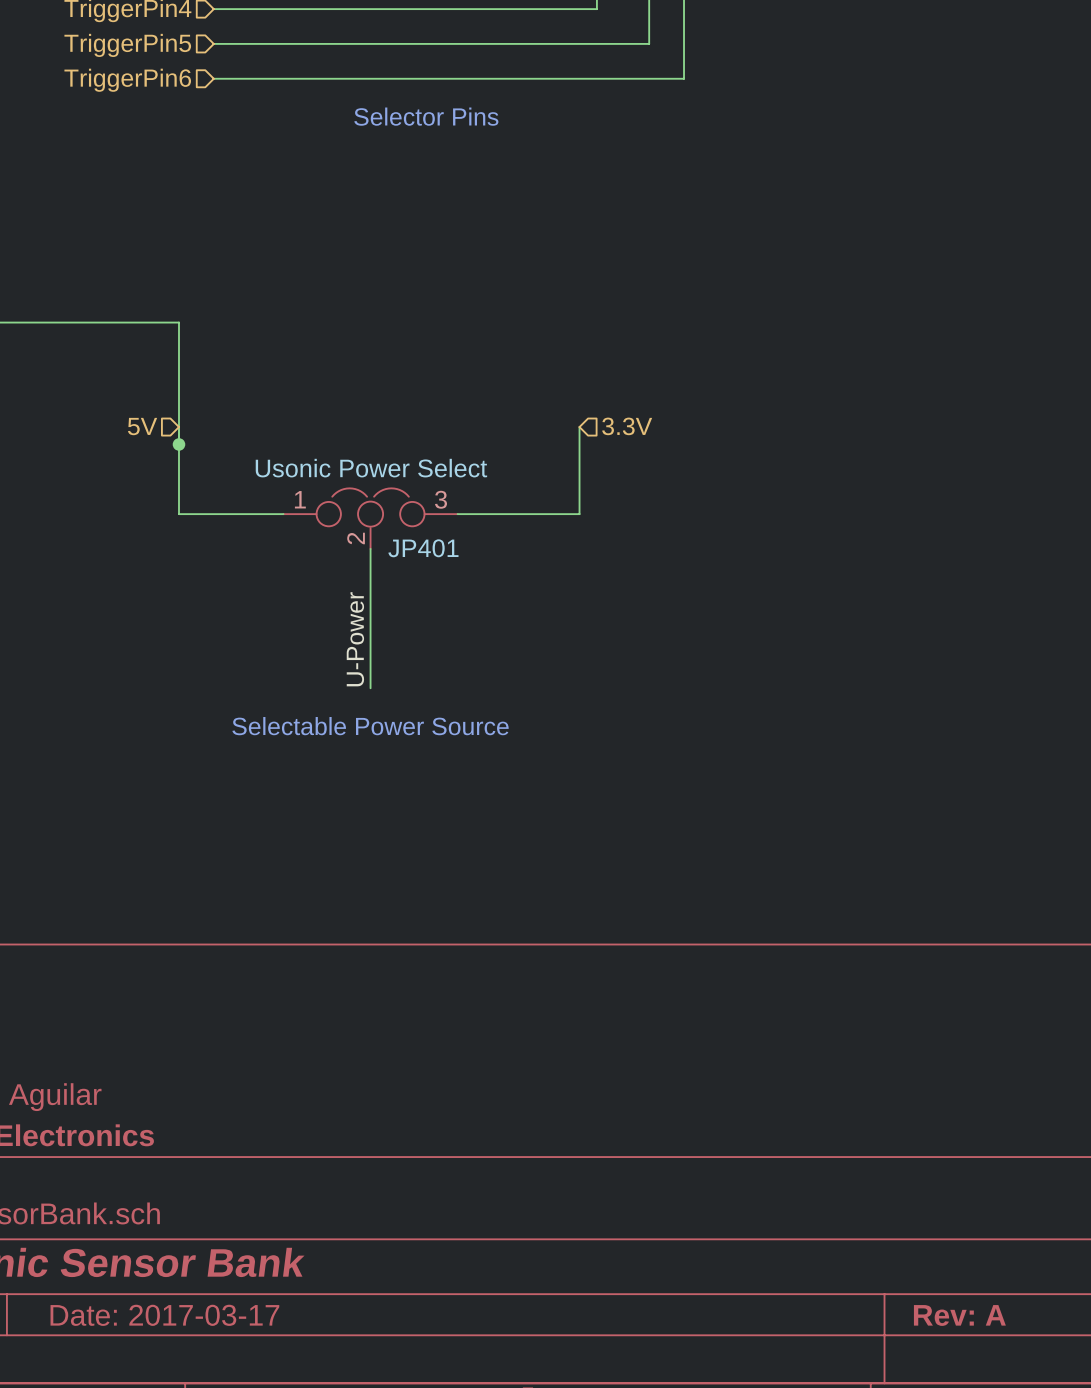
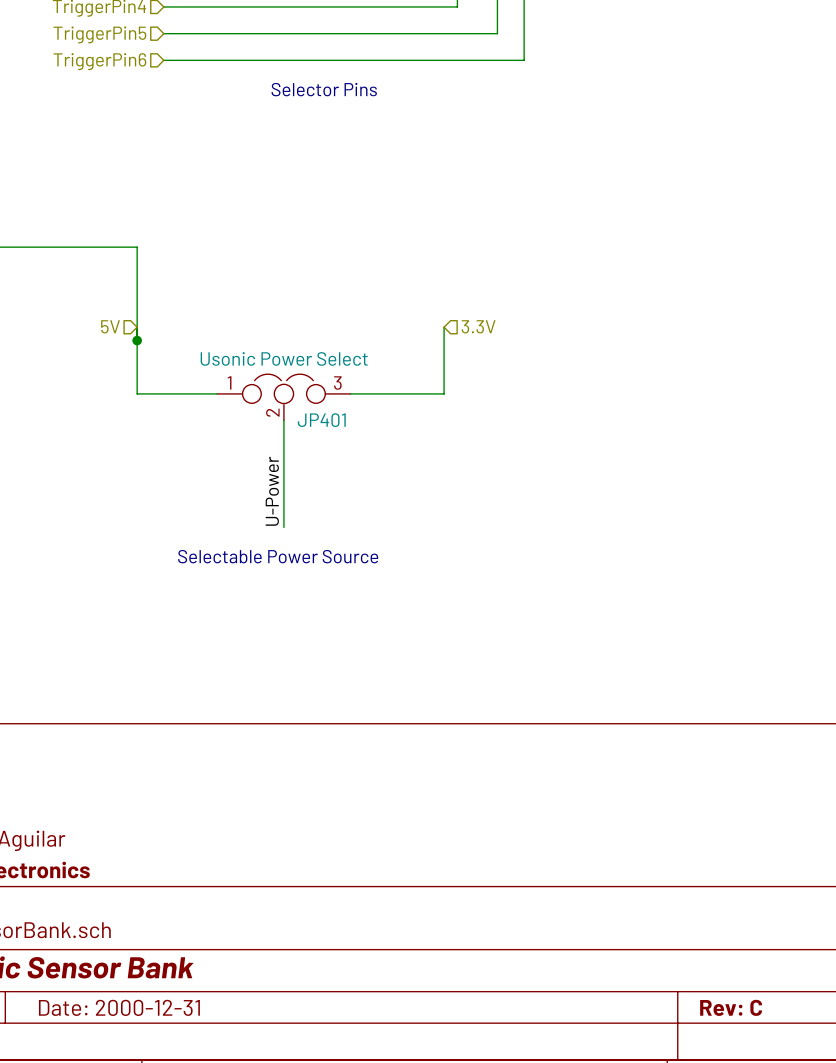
title block: Date: 2017-03-17 (164, 1315) -> Date: 2000-12-31 (119, 1007)
title block: Rev: A (959, 1315) -> Rev: C (731, 1007)

